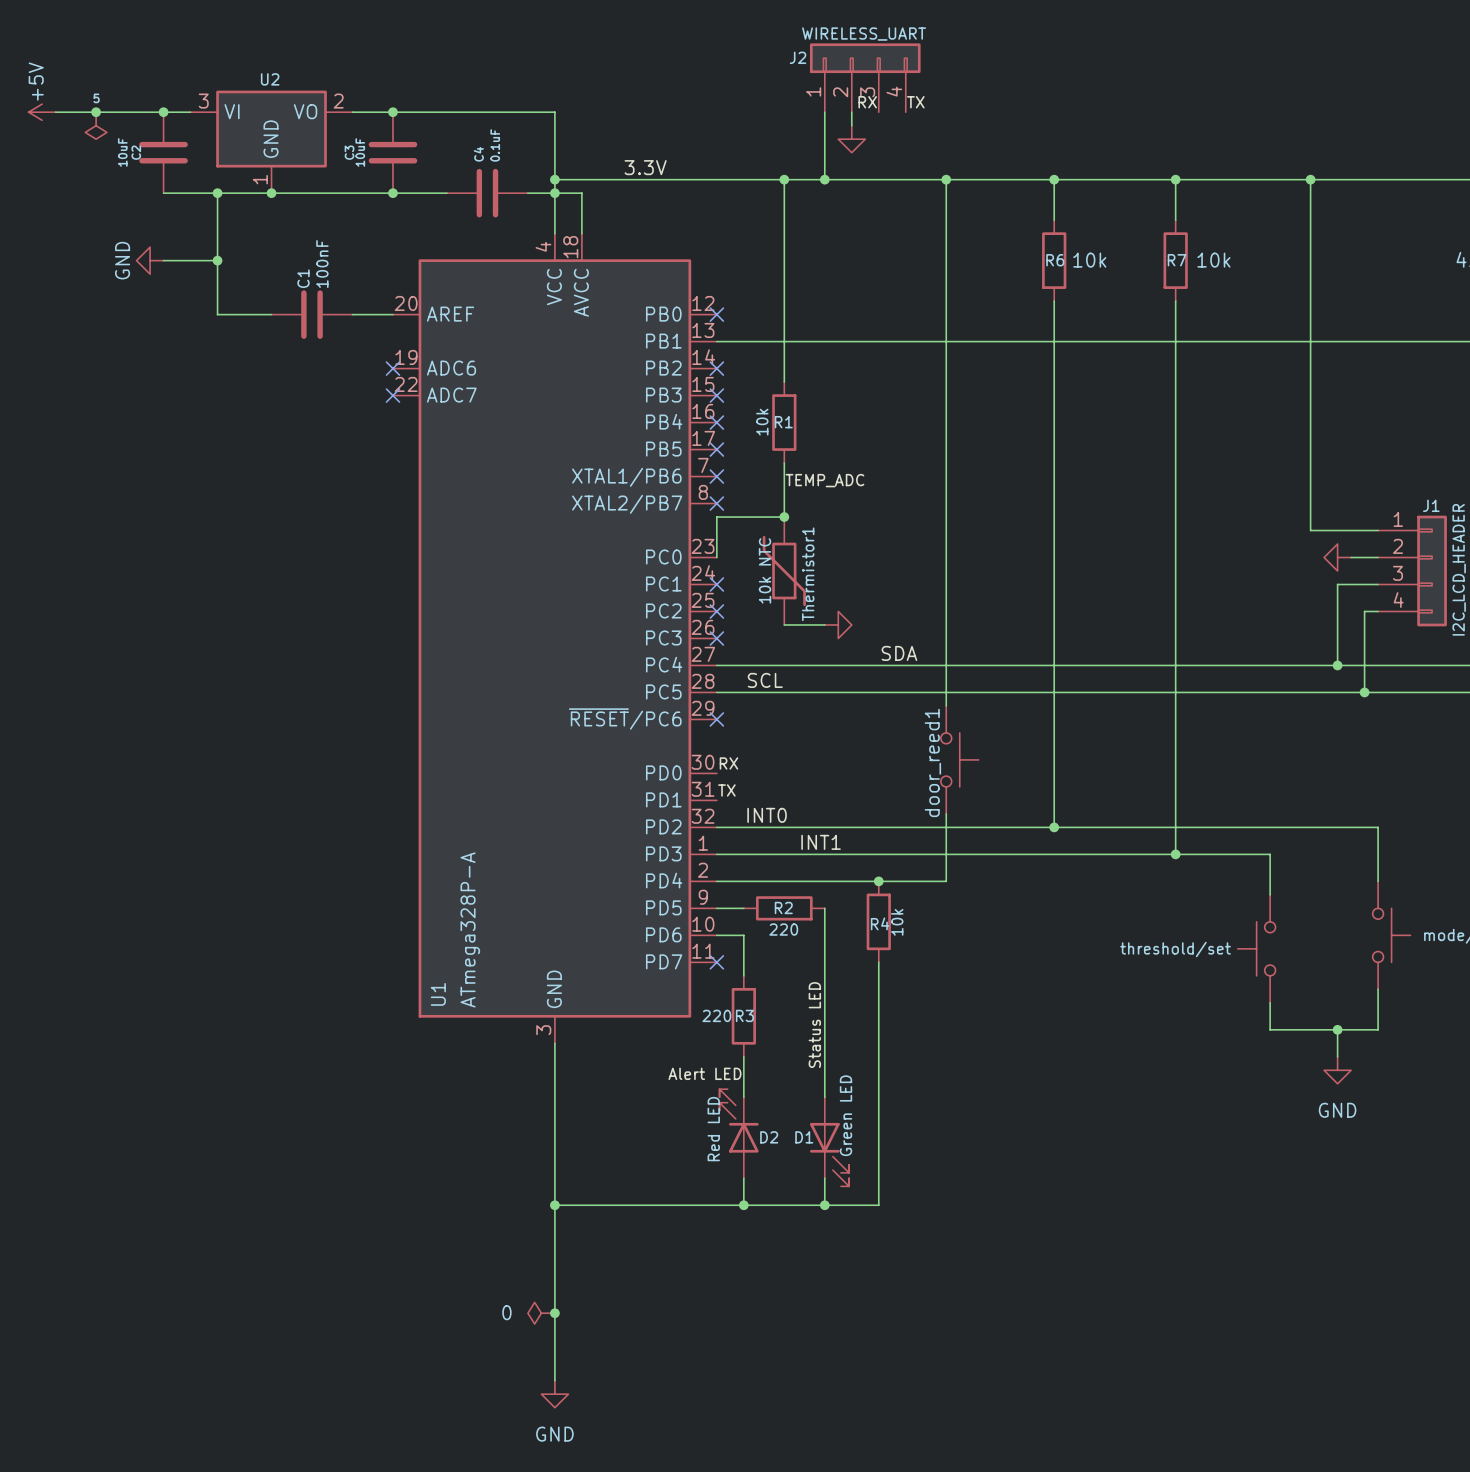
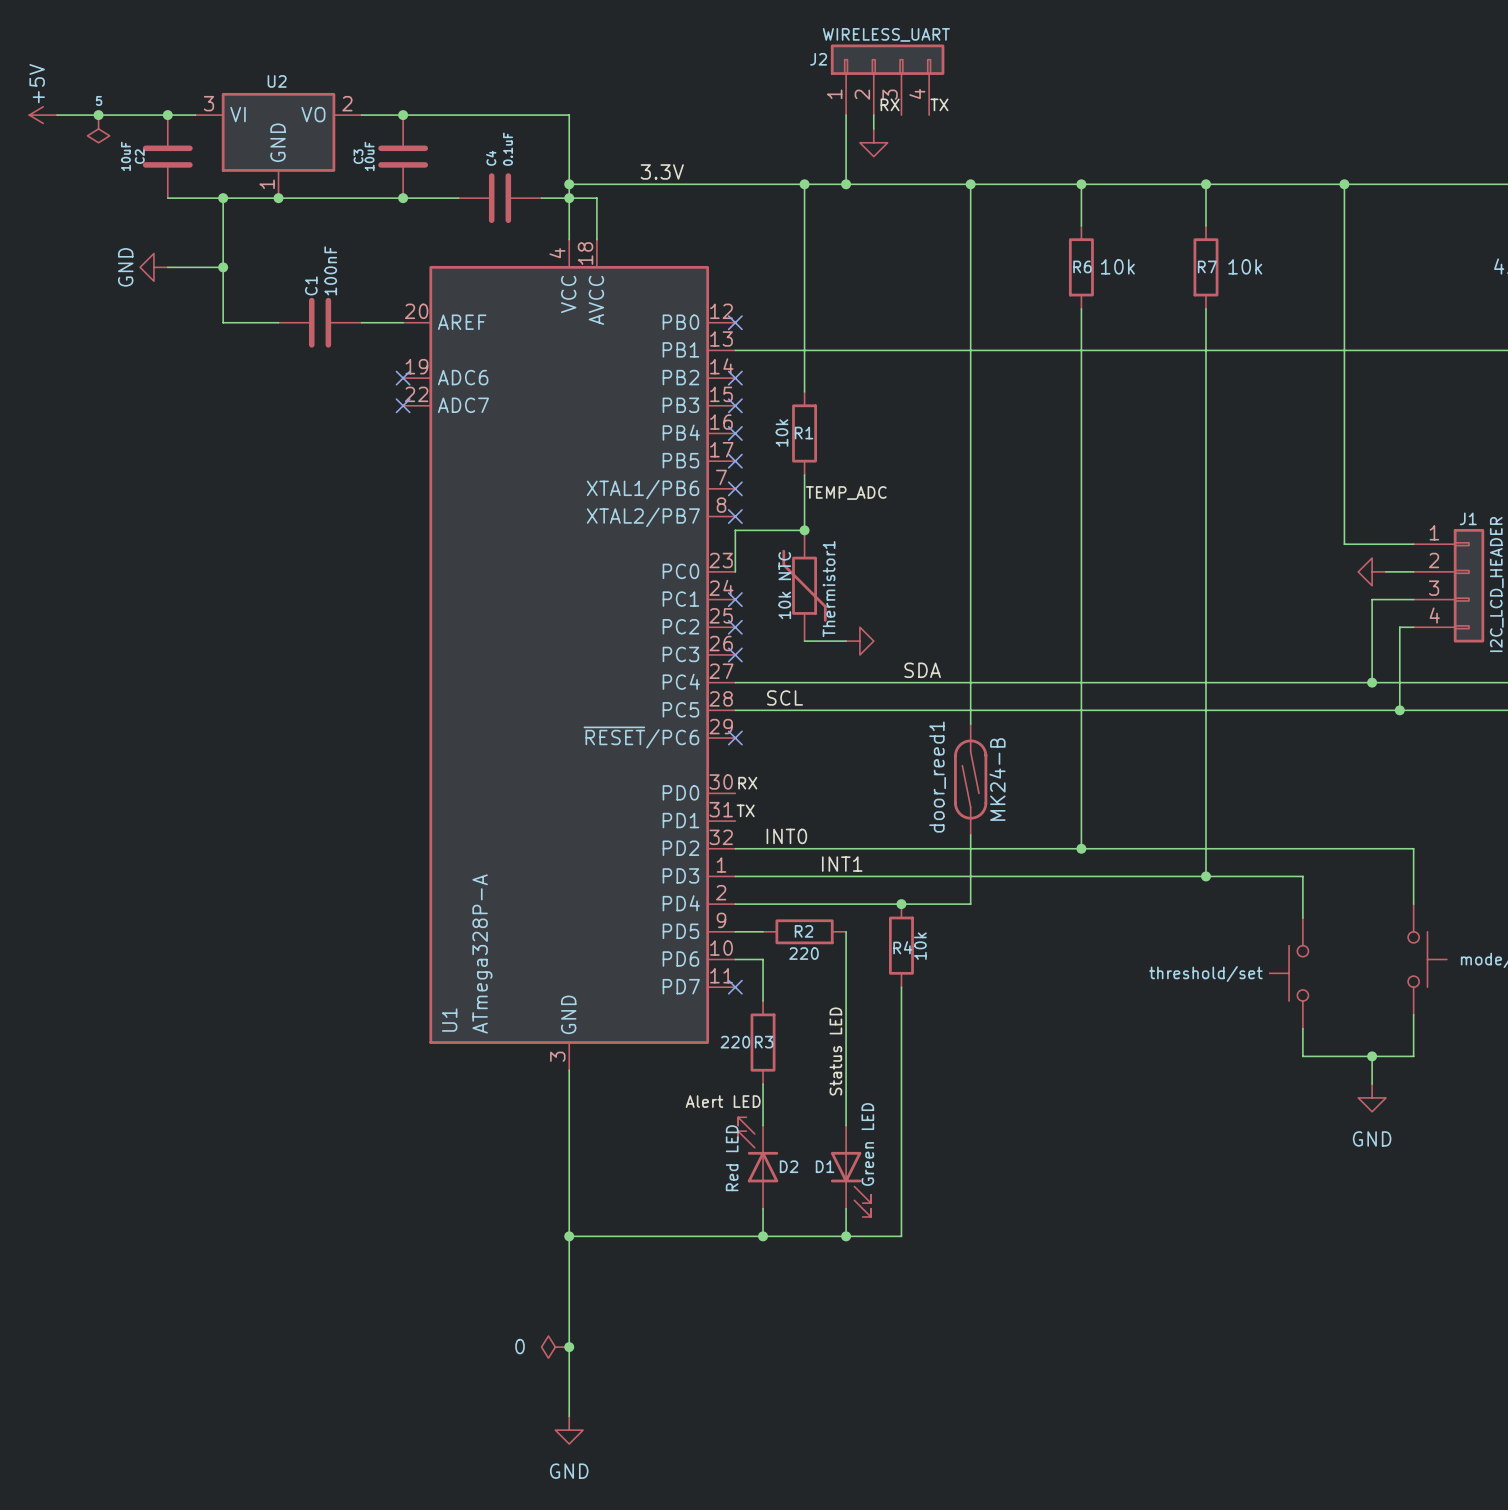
door_reed1: none -> MK24-B (970, 779)
part: door_reed1 (959, 759) -> none

